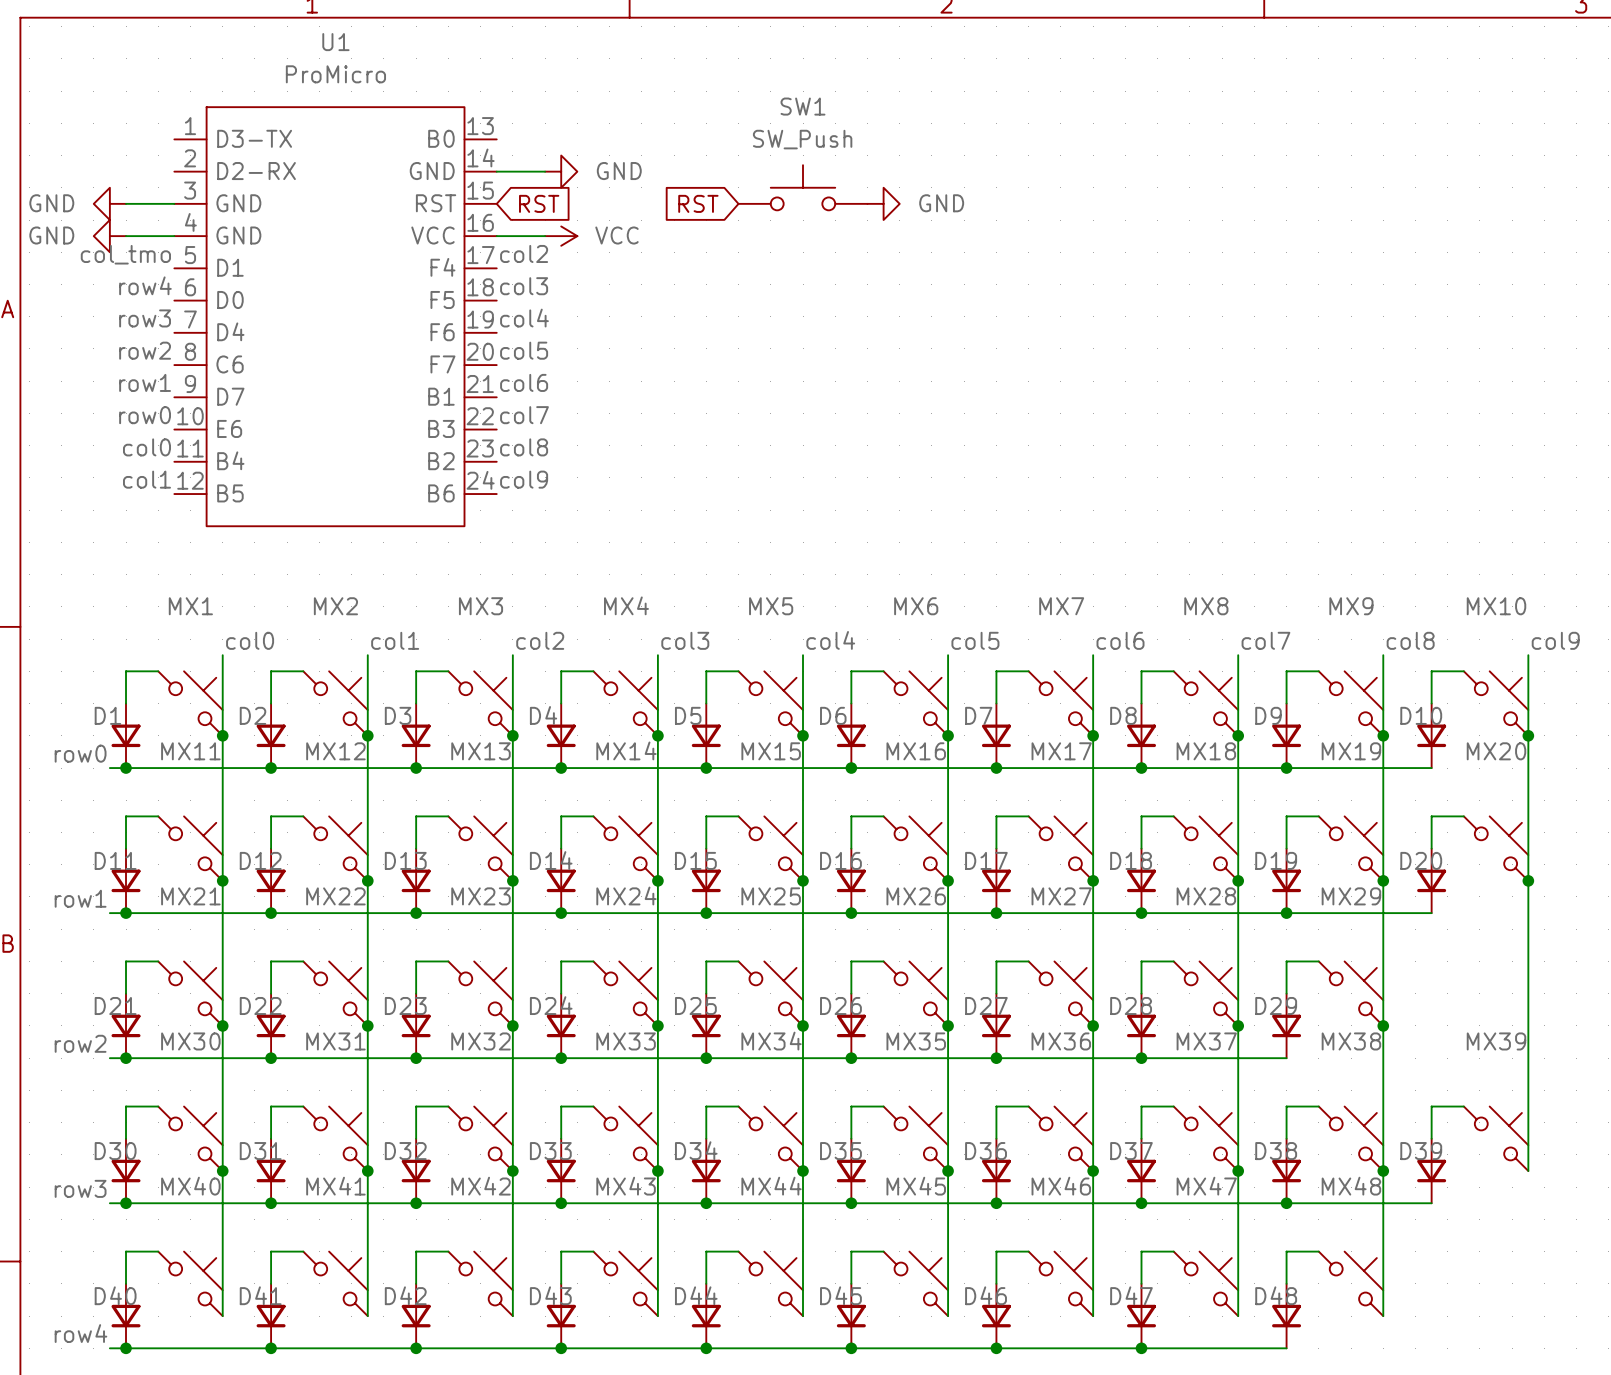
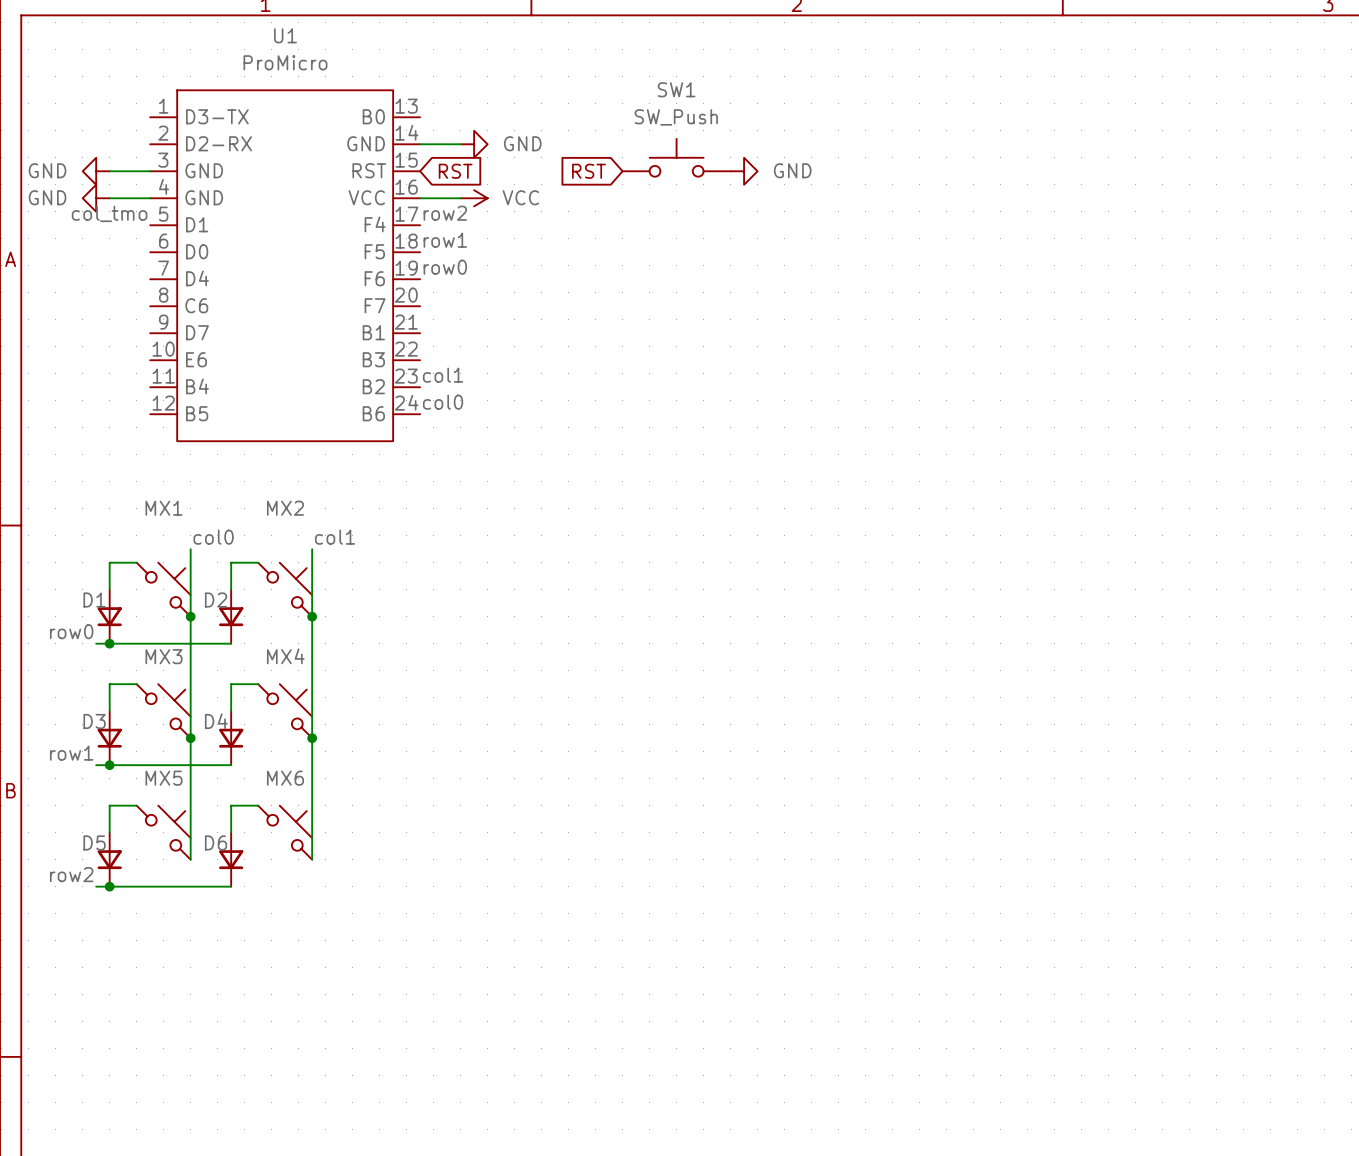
label: col2 (524, 253) -> row2 (445, 213)
label: row4 (145, 285) -> none
label: col3 (524, 286) -> row1 (445, 240)
label: row3 (145, 318) -> none
label: col4 (524, 318) -> row0 (445, 267)
label: row2 (145, 350) -> none
label: col5 (524, 350) -> none
label: row1 (145, 382) -> none
label: col6 (524, 382) -> none
label: row0 (145, 415) -> none
label: col7 (524, 415) -> none
label: col0 (146, 447) -> none
label: col8 (524, 447) -> col1 (443, 375)
label: col1 (146, 479) -> none
label: col9 (524, 479) -> col0 (443, 402)
label: col2 (540, 640) -> none
label: col3 (685, 640) -> none
label: col4 (830, 640) -> none
label: col5 (975, 640) -> none
label: col6 (1120, 640) -> none
label: col7 (1265, 640) -> none
label: col8 (1410, 640) -> none
label: col9 (1555, 640) -> none
wire: (512, 655) (512, 1316) -> none
wire: (657, 655) (657, 1316) -> none
wire: (803, 655) (803, 1316) -> none
wire: (948, 655) (948, 1316) -> none
wire: (1093, 655) (1093, 1316) -> none
wire: (1238, 655) (1238, 1316) -> none
wire: (1383, 655) (1383, 1316) -> none
wire: (1528, 655) (1528, 1171) -> none
wire: (448, 671) (416, 671) (416, 703) -> none
wire: (593, 671) (561, 671) (561, 703) -> none
wire: (738, 671) (706, 671) (706, 703) -> none
wire: (883, 671) (851, 671) (851, 703) -> none
wire: (1028, 671) (996, 671) (996, 703) -> none
wire: (1173, 671) (1141, 671) (1141, 703) -> none
wire: (1318, 671) (1286, 671) (1286, 703) -> none
wire: (1463, 671) (1431, 671) (1431, 703) -> none
MX3: (480, 703) -> none
MX4: (625, 703) -> none
MX5: (770, 703) -> none
MX6: (915, 703) -> none
MX7: (1060, 703) -> none
MX8: (1205, 703) -> none
MX9: (1351, 703) -> none
MX10: (1496, 703) -> none
D3: (416, 735) -> none
junction: (512, 735) -> none
D4: (561, 735) -> none
junction: (657, 735) -> none
D5: (706, 735) -> none
junction: (803, 735) -> none
D6: (851, 735) -> none
junction: (948, 735) -> none
D7: (996, 735) -> none
junction: (1093, 735) -> none
D8: (1141, 735) -> none
junction: (1238, 735) -> none
D9: (1286, 735) -> none
junction: (1383, 735) -> none
D10: (1431, 735) -> none
junction: (1528, 735) -> none
MX11 name: MX11 (190, 751) -> MX3 (163, 656)
MX12 name: MX12 (335, 751) -> MX4 (285, 656)
wire: (271, 768) (1431, 768) -> none
junction: (271, 768) -> none
junction: (416, 768) -> none
junction: (561, 768) -> none
junction: (706, 768) -> none
junction: (851, 768) -> none
junction: (996, 768) -> none
junction: (1141, 768) -> none
junction: (1286, 768) -> none
wire: (448, 816) (416, 816) (416, 848) -> none
wire: (593, 816) (561, 816) (561, 848) -> none
wire: (738, 816) (706, 816) (706, 848) -> none
wire: (883, 816) (851, 816) (851, 848) -> none
wire: (1028, 816) (996, 816) (996, 848) -> none
wire: (1173, 816) (1141, 816) (1141, 848) -> none
wire: (1318, 816) (1286, 816) (1286, 848) -> none
wire: (1463, 816) (1431, 816) (1431, 848) -> none
MX13: (480, 848) -> none
MX14: (625, 848) -> none
MX15: (770, 848) -> none
MX16: (915, 848) -> none
MX17: (1060, 848) -> none
MX18: (1205, 848) -> none
MX19: (1351, 848) -> none
MX20: (1496, 848) -> none
D11 name: D11 (115, 860) -> D3 (94, 721)
D12 name: D12 (260, 860) -> D4 (216, 721)
D13: (416, 880) -> none
junction: (512, 880) -> none
D14: (561, 880) -> none
junction: (657, 880) -> none
D15: (706, 880) -> none
junction: (803, 880) -> none
D16: (851, 880) -> none
junction: (948, 880) -> none
D17: (996, 880) -> none
junction: (1093, 880) -> none
D18: (1141, 880) -> none
junction: (1238, 880) -> none
D19: (1286, 880) -> none
junction: (1383, 880) -> none
D20: (1431, 880) -> none
junction: (1528, 880) -> none
MX21 name: MX21 (190, 896) -> MX5 (163, 778)
MX22 name: MX22 (335, 896) -> MX6 (285, 778)
wire: (271, 913) (1431, 913) -> none
junction: (271, 913) -> none
junction: (416, 913) -> none
junction: (561, 913) -> none
junction: (706, 913) -> none
junction: (851, 913) -> none
junction: (996, 913) -> none
junction: (1141, 913) -> none
junction: (1286, 913) -> none
wire: (448, 961) (416, 961) (416, 993) -> none
wire: (593, 961) (561, 961) (561, 993) -> none
wire: (738, 961) (706, 961) (706, 993) -> none
wire: (883, 961) (851, 961) (851, 993) -> none
wire: (1028, 961) (996, 961) (996, 993) -> none
wire: (1173, 961) (1141, 961) (1141, 993) -> none
wire: (1318, 961) (1286, 961) (1286, 993) -> none
MX23: (480, 993) -> none
MX24: (625, 993) -> none
MX25: (770, 993) -> none
MX26: (915, 993) -> none
MX27: (1060, 993) -> none
MX28: (1205, 993) -> none
MX29: (1351, 993) -> none
D21 name: D21 (115, 1005) -> D5 (94, 842)
D22 name: D22 (260, 1005) -> D6 (216, 842)
wire: (222, 1025) (222, 1316) -> none
junction: (222, 1025) -> none
wire: (367, 1025) (367, 1316) -> none
junction: (367, 1025) -> none
D23: (416, 1025) -> none
junction: (512, 1025) -> none
D24: (561, 1025) -> none
junction: (657, 1025) -> none
D25: (706, 1025) -> none
junction: (803, 1025) -> none
D26: (851, 1025) -> none
junction: (948, 1025) -> none
D27: (996, 1025) -> none
junction: (1093, 1025) -> none
D28: (1141, 1025) -> none
junction: (1238, 1025) -> none
D29: (1286, 1025) -> none
junction: (1383, 1025) -> none
wire: (271, 1058) (1286, 1058) -> none
junction: (271, 1058) -> none
junction: (416, 1058) -> none
junction: (561, 1058) -> none
junction: (706, 1058) -> none
junction: (851, 1058) -> none
junction: (996, 1058) -> none
junction: (1141, 1058) -> none
wire: (158, 1106) (126, 1106) (126, 1138) -> none
wire: (303, 1106) (271, 1106) (271, 1138) -> none
wire: (448, 1106) (416, 1106) (416, 1138) -> none
wire: (593, 1106) (561, 1106) (561, 1138) -> none
wire: (738, 1106) (706, 1106) (706, 1138) -> none
wire: (883, 1106) (851, 1106) (851, 1138) -> none
wire: (1028, 1106) (996, 1106) (996, 1138) -> none
wire: (1173, 1106) (1141, 1106) (1141, 1138) -> none
wire: (1318, 1106) (1286, 1106) (1286, 1138) -> none
wire: (1463, 1106) (1431, 1106) (1431, 1138) -> none
MX30: (190, 1138) -> none
MX31: (335, 1138) -> none
MX32: (480, 1138) -> none
MX33: (625, 1138) -> none
MX34: (770, 1138) -> none
MX35: (915, 1138) -> none
MX36: (1060, 1138) -> none
MX37: (1205, 1138) -> none
MX38: (1351, 1138) -> none
MX39: (1496, 1138) -> none
D30: (126, 1171) -> none
junction: (222, 1171) -> none
D31: (271, 1171) -> none
junction: (367, 1171) -> none
D32: (416, 1171) -> none
junction: (512, 1171) -> none
D33: (561, 1171) -> none
junction: (657, 1171) -> none
D34: (706, 1171) -> none
junction: (803, 1171) -> none
D35: (851, 1171) -> none
junction: (948, 1171) -> none
D36: (996, 1171) -> none
junction: (1093, 1171) -> none
D37: (1141, 1171) -> none
junction: (1238, 1171) -> none
D38: (1286, 1171) -> none
junction: (1383, 1171) -> none
D39: (1431, 1171) -> none
label: row3 (80, 1188) -> none
wire: (109, 1203) (1431, 1203) -> none
junction: (126, 1203) -> none
junction: (271, 1203) -> none
junction: (416, 1203) -> none
junction: (561, 1203) -> none
junction: (706, 1203) -> none
junction: (851, 1203) -> none
junction: (996, 1203) -> none
junction: (1141, 1203) -> none
junction: (1286, 1203) -> none
wire: (158, 1251) (126, 1251) (126, 1283) -> none
wire: (303, 1251) (271, 1251) (271, 1283) -> none
wire: (448, 1251) (416, 1251) (416, 1283) -> none
wire: (593, 1251) (561, 1251) (561, 1283) -> none
wire: (738, 1251) (706, 1251) (706, 1283) -> none
wire: (883, 1251) (851, 1251) (851, 1283) -> none
wire: (1028, 1251) (996, 1251) (996, 1283) -> none
wire: (1173, 1251) (1141, 1251) (1141, 1283) -> none
wire: (1318, 1251) (1286, 1251) (1286, 1283) -> none
MX40: (190, 1283) -> none
MX41: (335, 1283) -> none
MX42: (480, 1283) -> none
MX43: (625, 1283) -> none
MX44: (770, 1283) -> none
MX45: (915, 1283) -> none
MX46: (1060, 1283) -> none
MX47: (1205, 1283) -> none
MX48: (1351, 1283) -> none
D40: (126, 1316) -> none
D41: (271, 1316) -> none
D42: (416, 1316) -> none
D43: (561, 1316) -> none
D44: (706, 1316) -> none
D45: (851, 1316) -> none
D46: (996, 1316) -> none
D47: (1141, 1316) -> none
D48: (1286, 1316) -> none
label: row4 (80, 1333) -> none
wire: (109, 1348) (1286, 1348) -> none
junction: (126, 1348) -> none
junction: (271, 1348) -> none
junction: (416, 1348) -> none
junction: (561, 1348) -> none
junction: (706, 1348) -> none
junction: (851, 1348) -> none
junction: (996, 1348) -> none
junction: (1141, 1348) -> none

